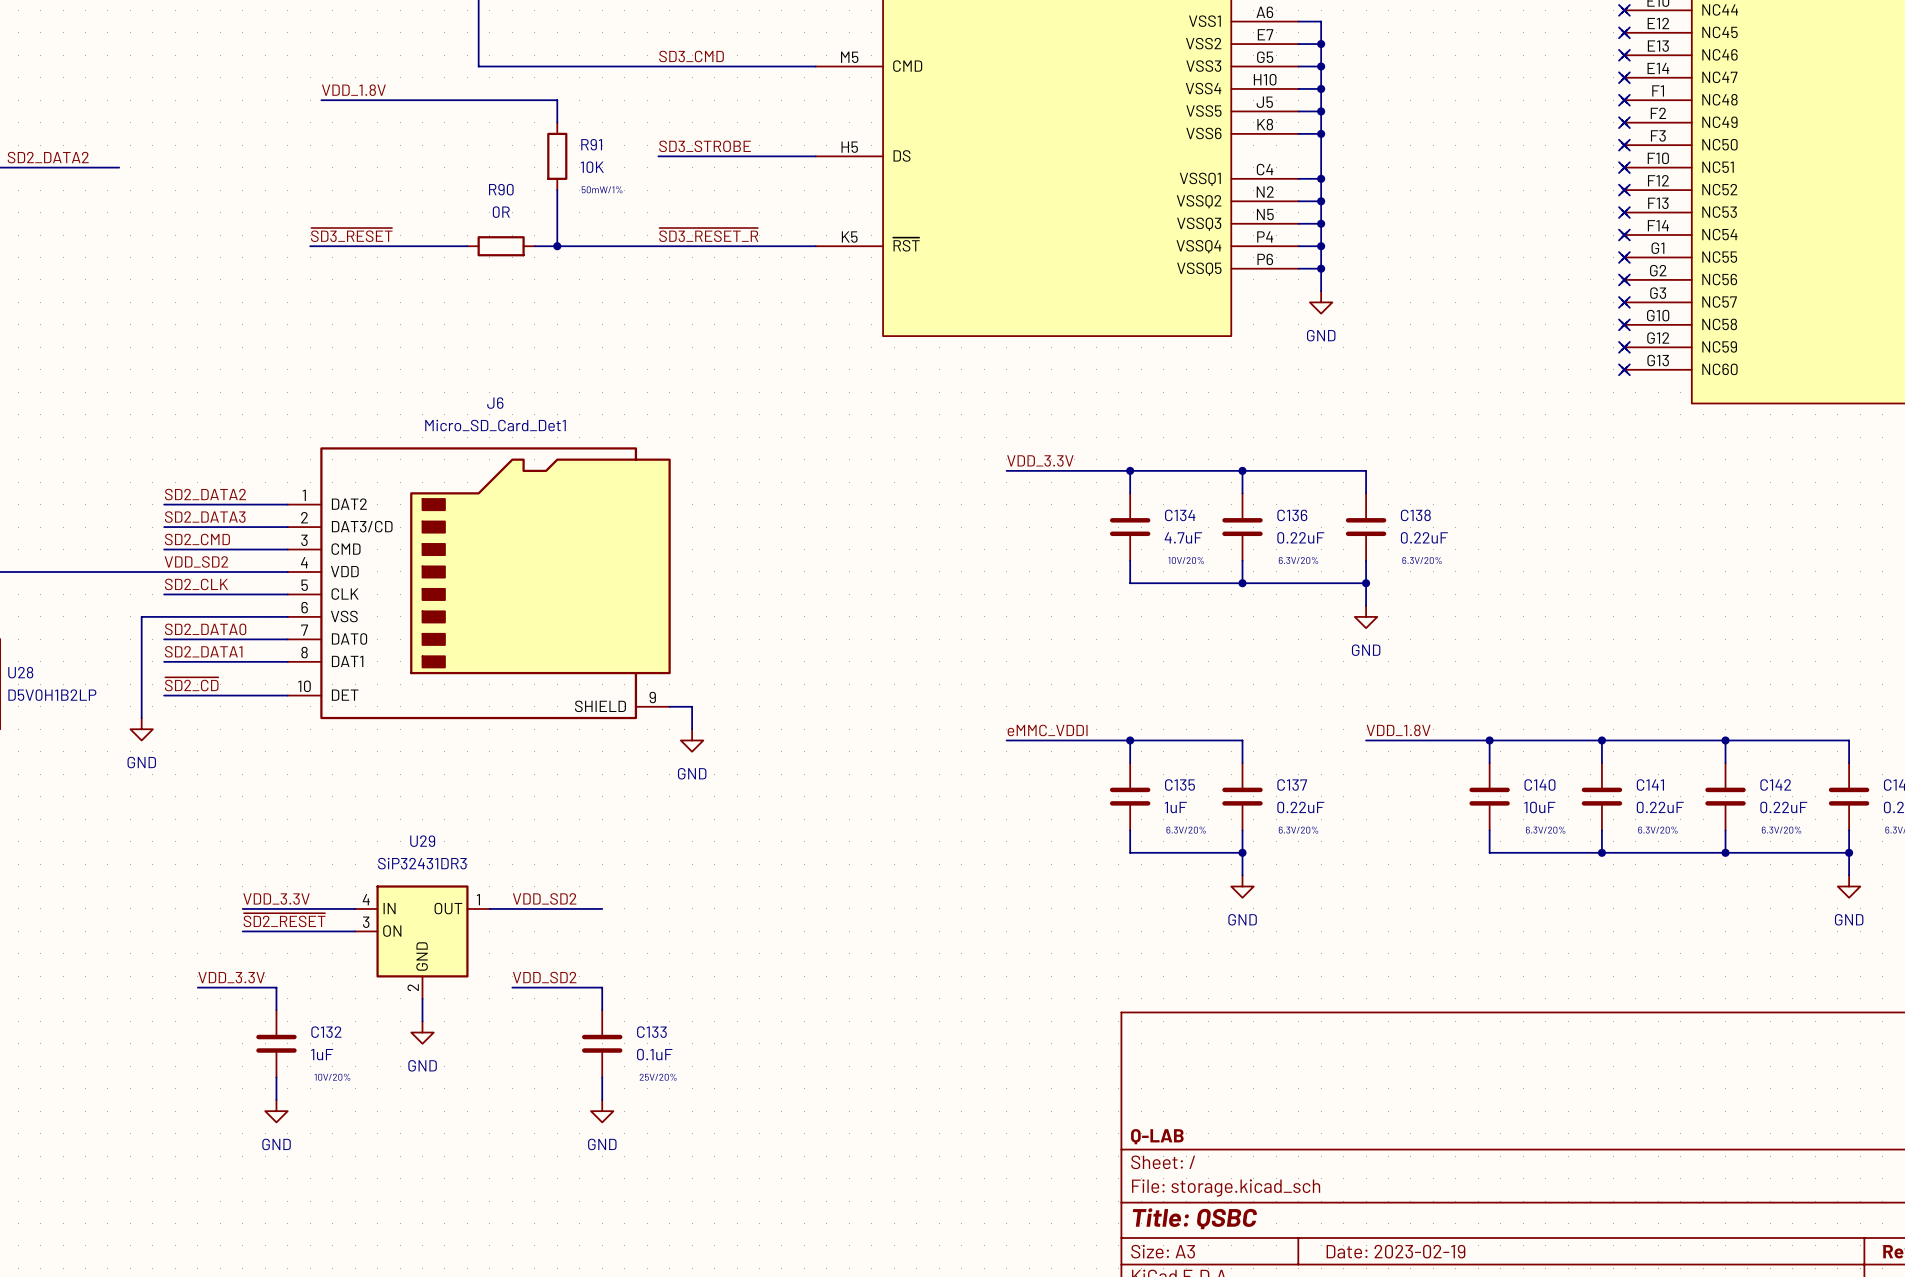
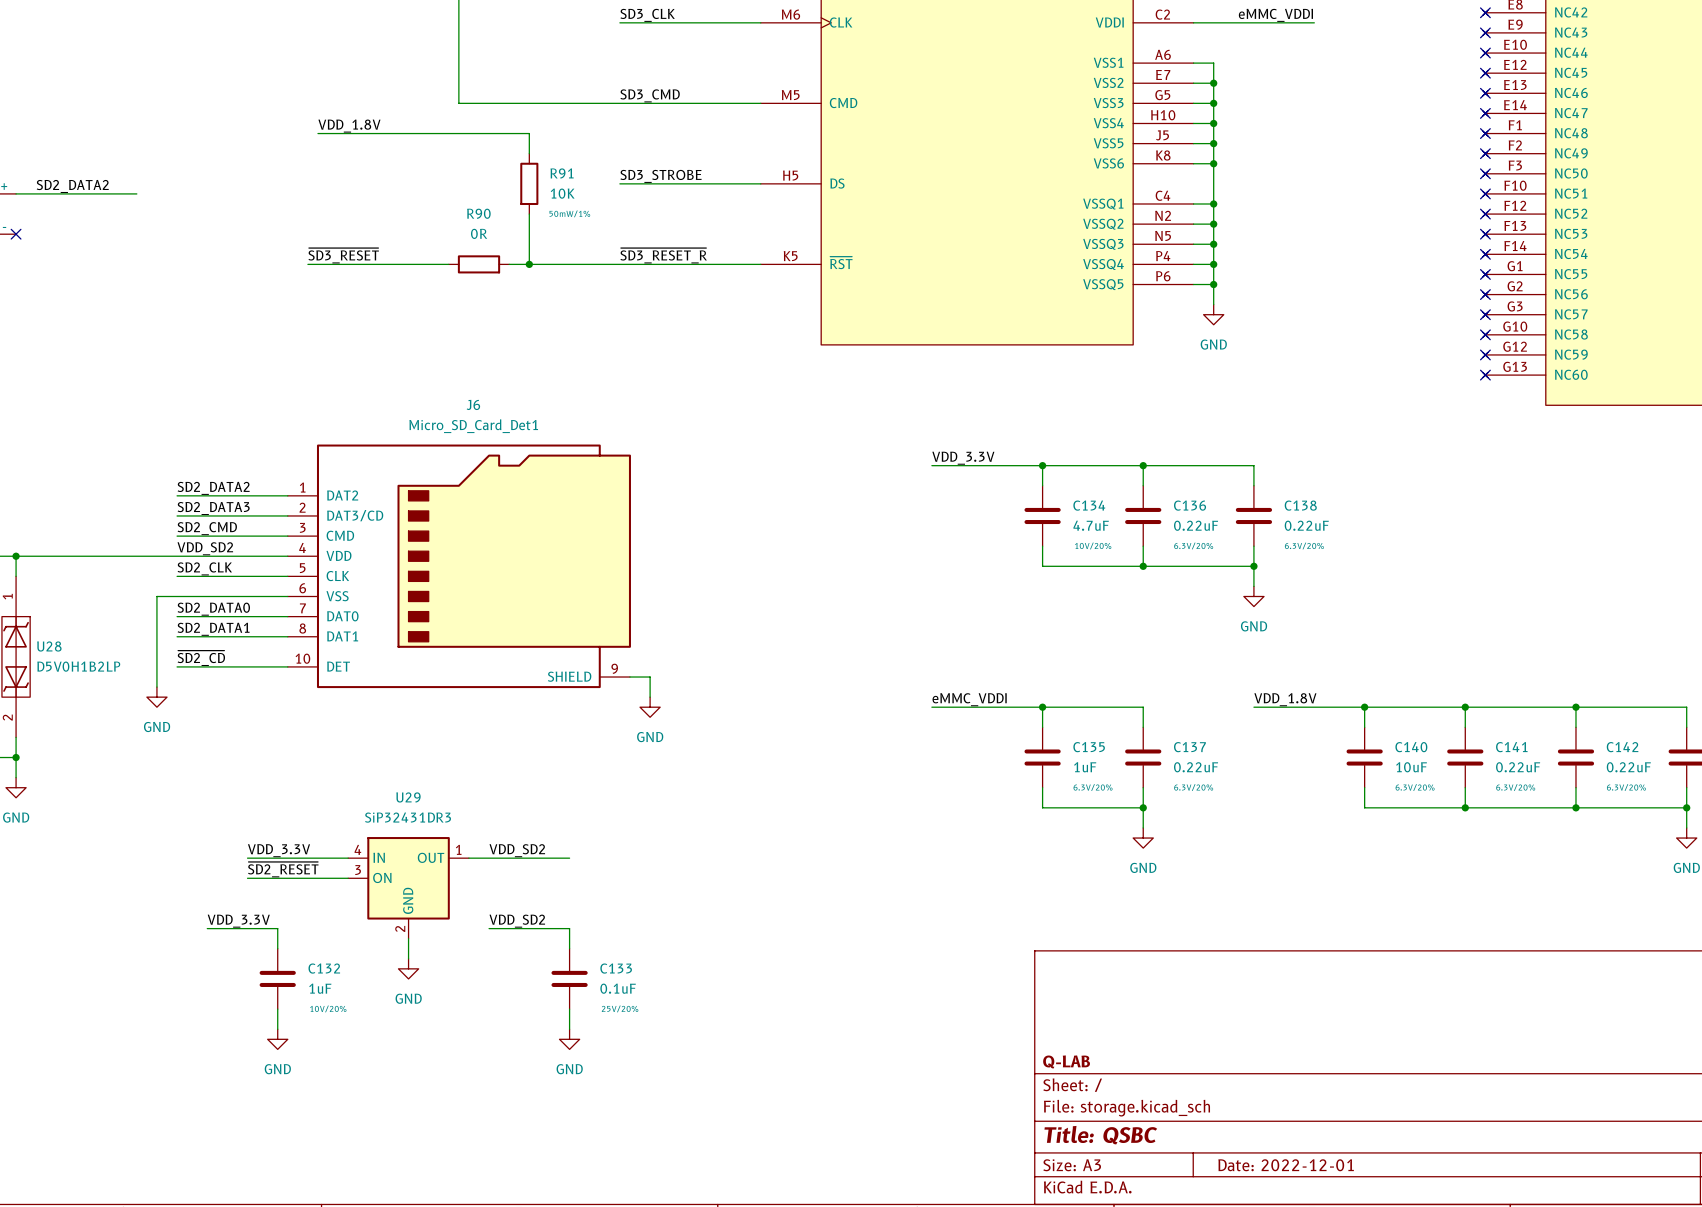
title block: Date: 2023-02-19 (1395, 1251) -> Date: 2022-12-01 (1286, 1165)

